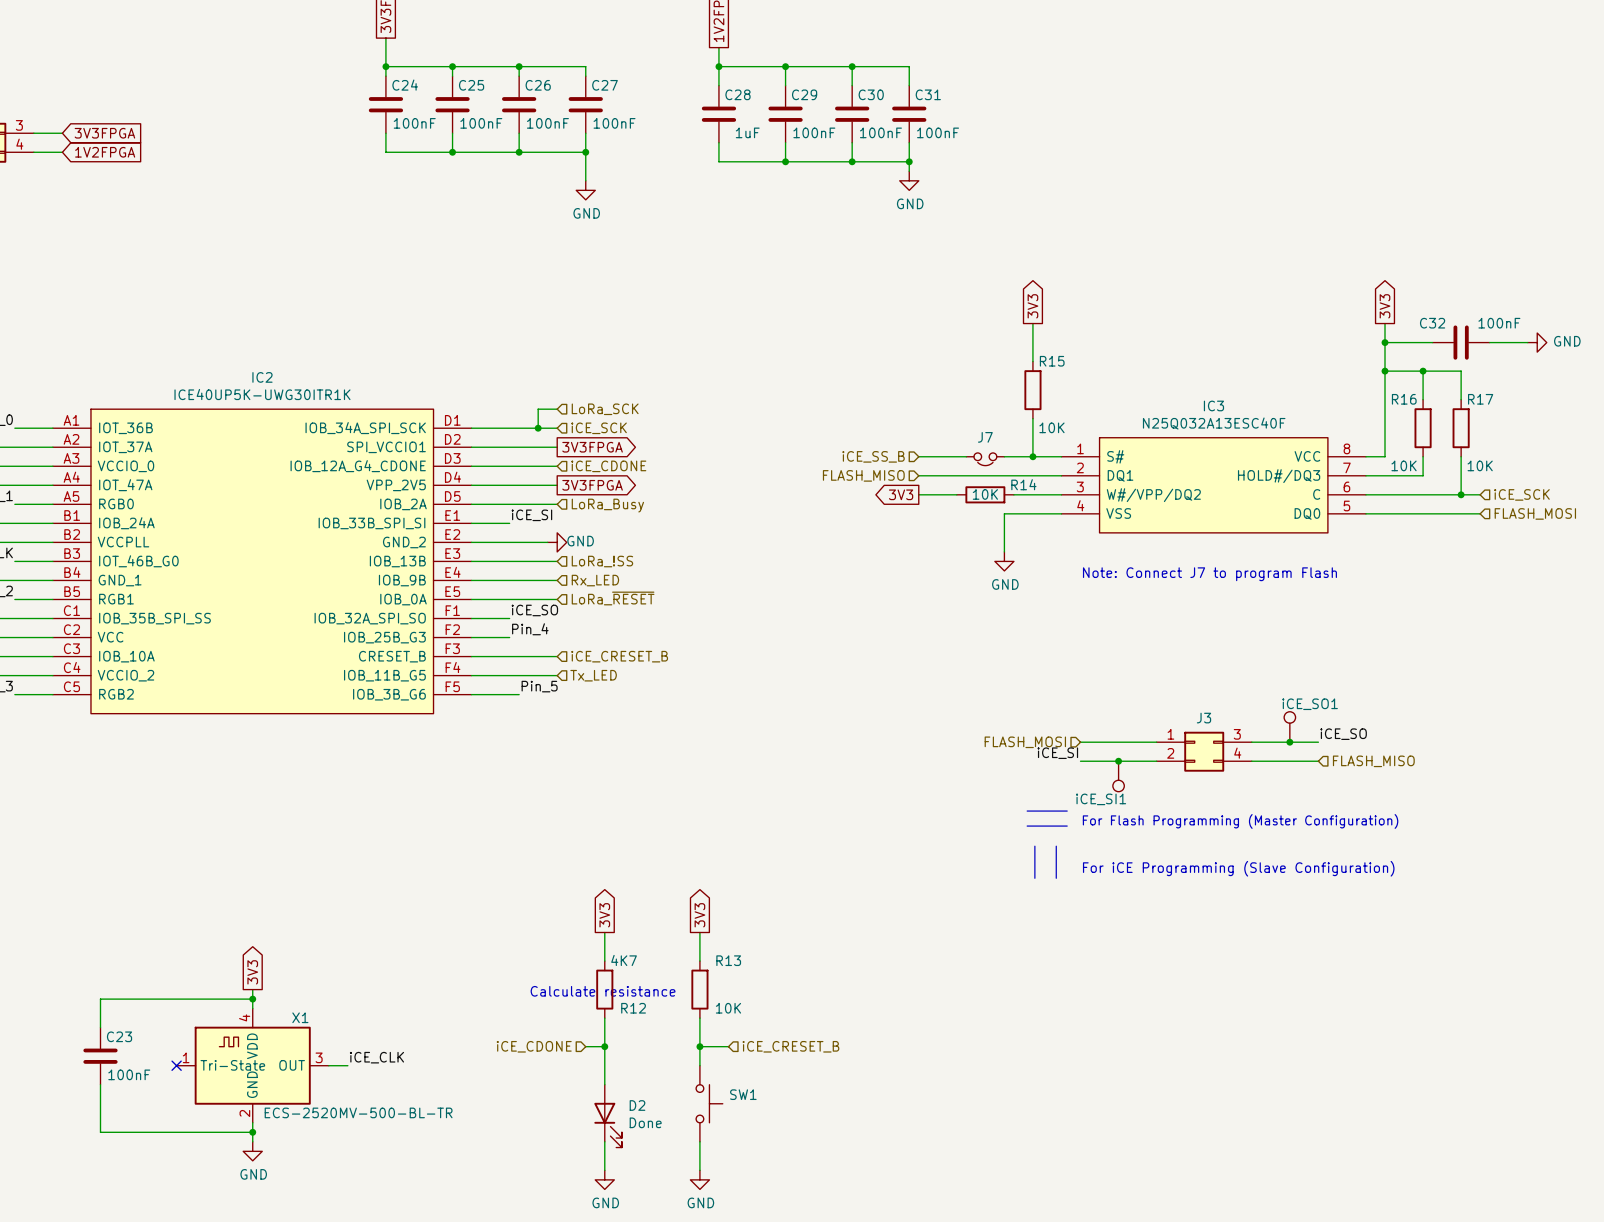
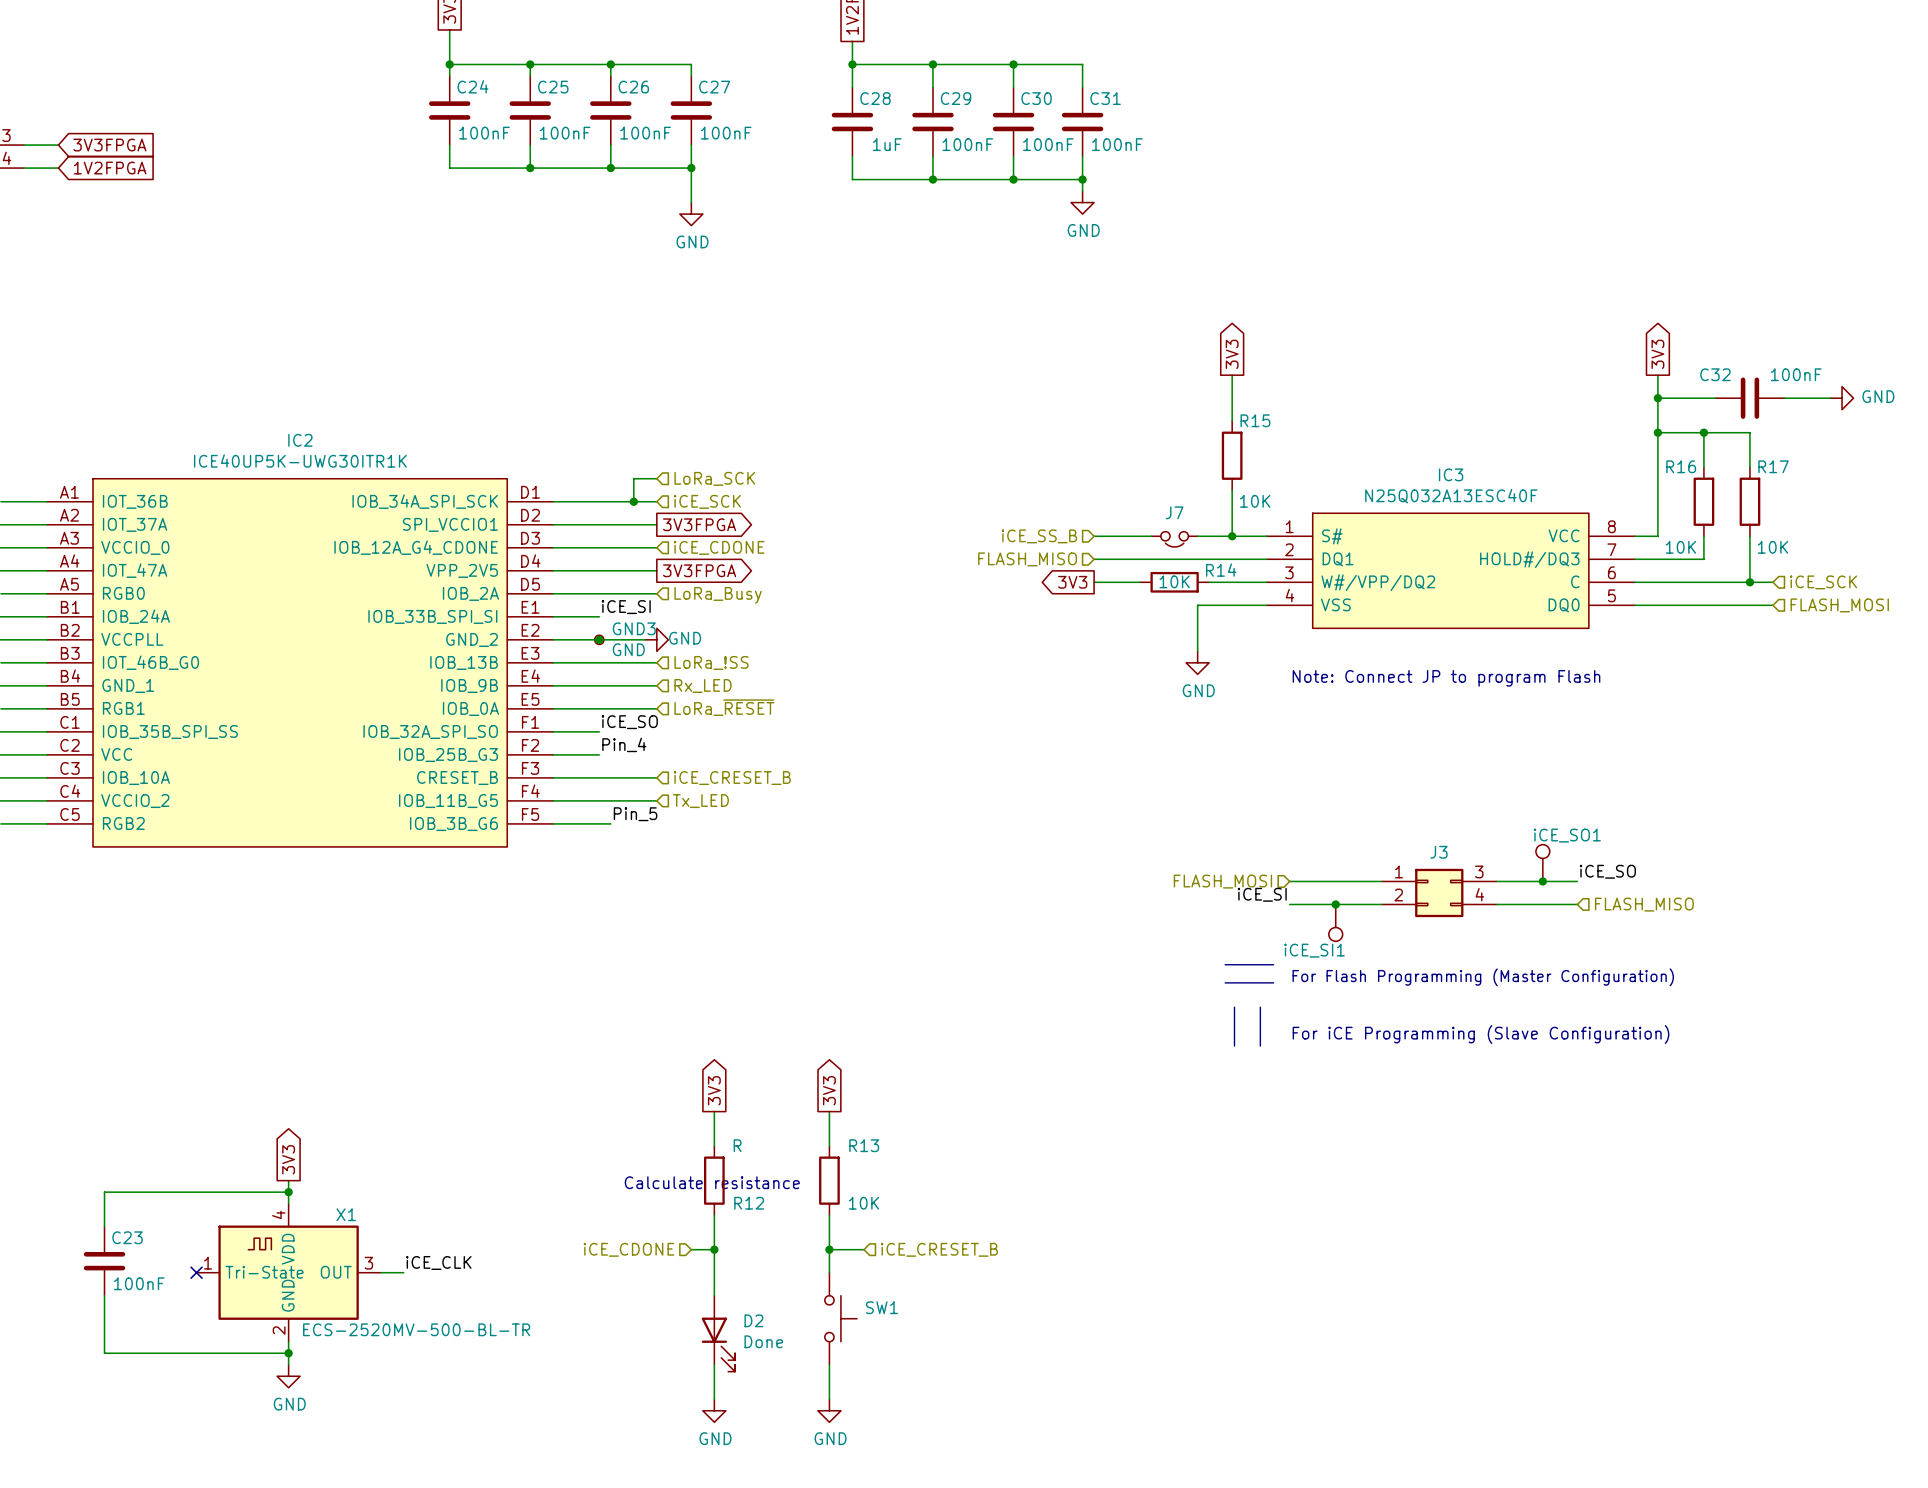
GND3: none -> GND (599, 639)
junction: none -> (599, 639)
text: Note: Connect J7 to program Flash (1209, 574) -> Note: Connect JP to program Flash (1446, 678)
R12 value: 4K7 (624, 960) -> R (737, 1145)

